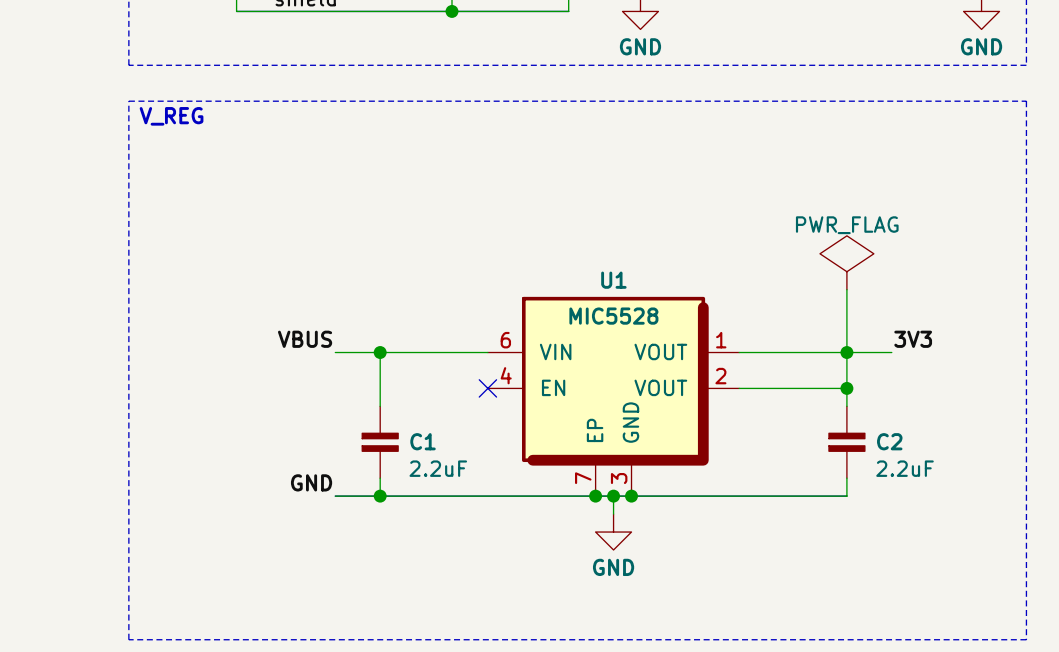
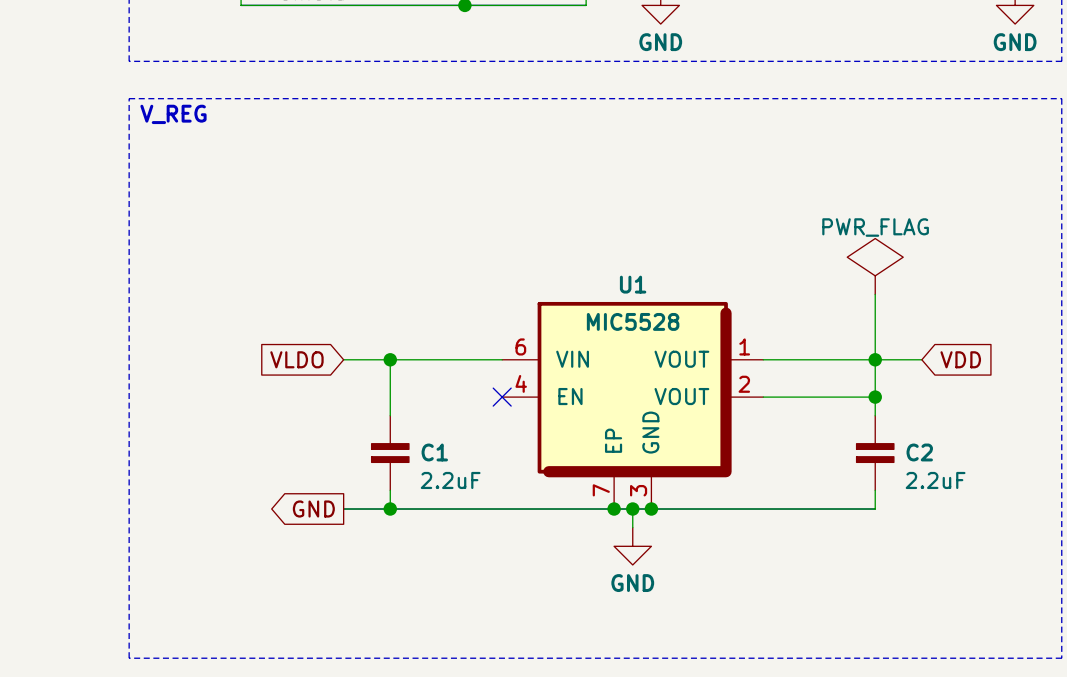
label: VBUS (305, 339) -> none
label: 3V3 (913, 339) -> none
global label: none -> VLDO (296, 359)
global label: none -> VDD (960, 359)
label: GND (311, 482) -> none
global label: none -> GND (313, 509)

